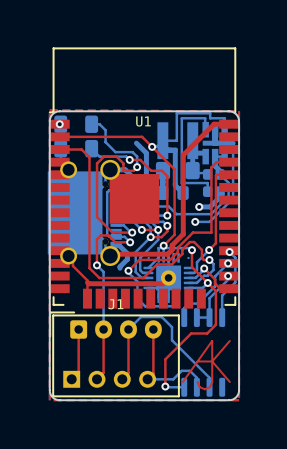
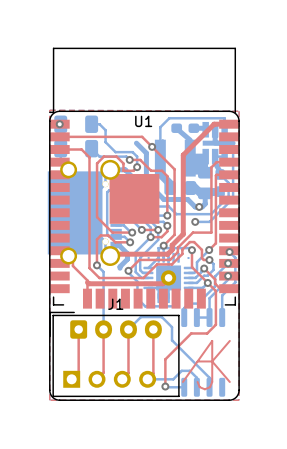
part footprint: [155, 112, 228, 200] -> [154, 117, 228, 200]
bottom track: none -> (146, 181) (163, 199) (187, 199) (195, 206) (199, 206)
bottom track: (220, 191) (220, 196) (210, 206) (202, 206) -> (205, 193) (205, 203) (202, 206)

